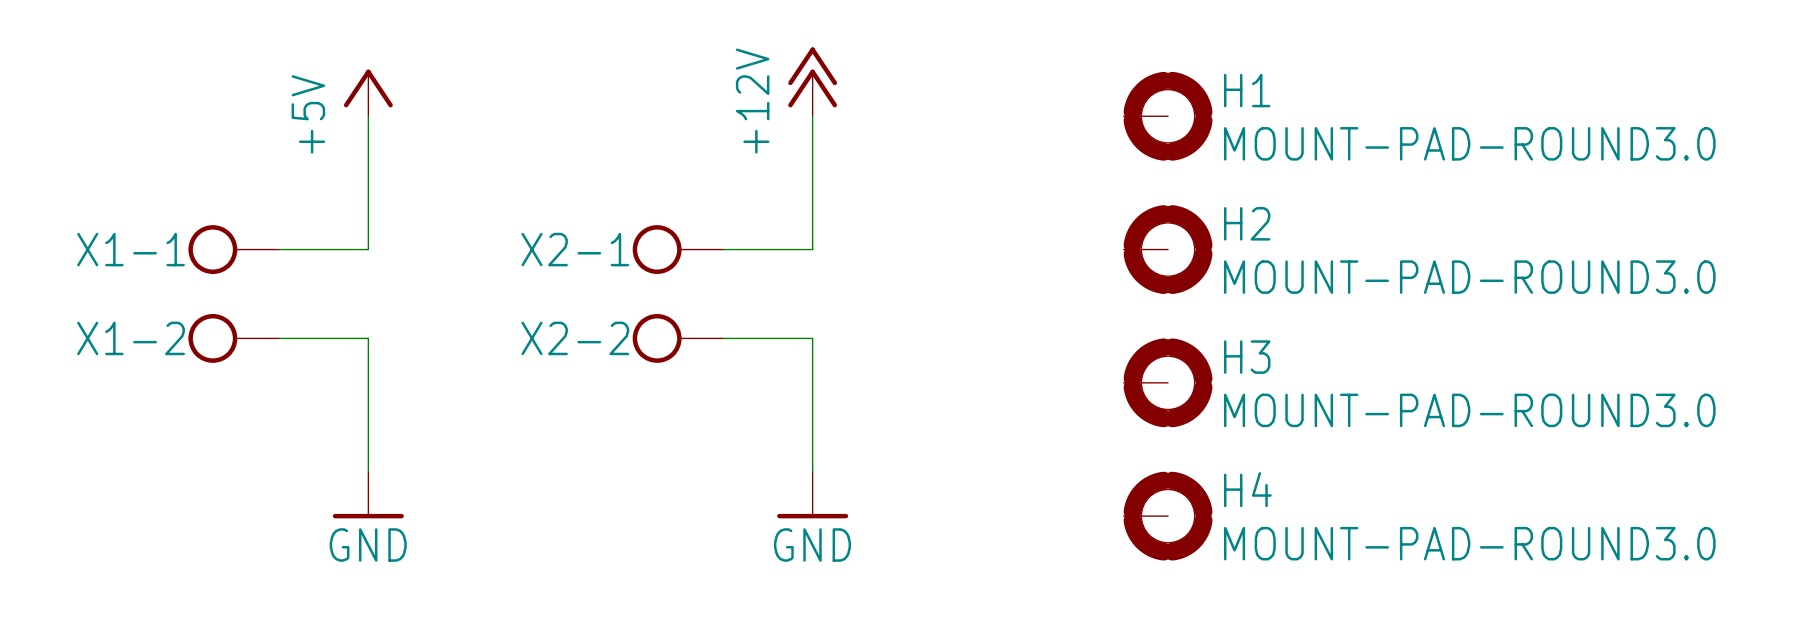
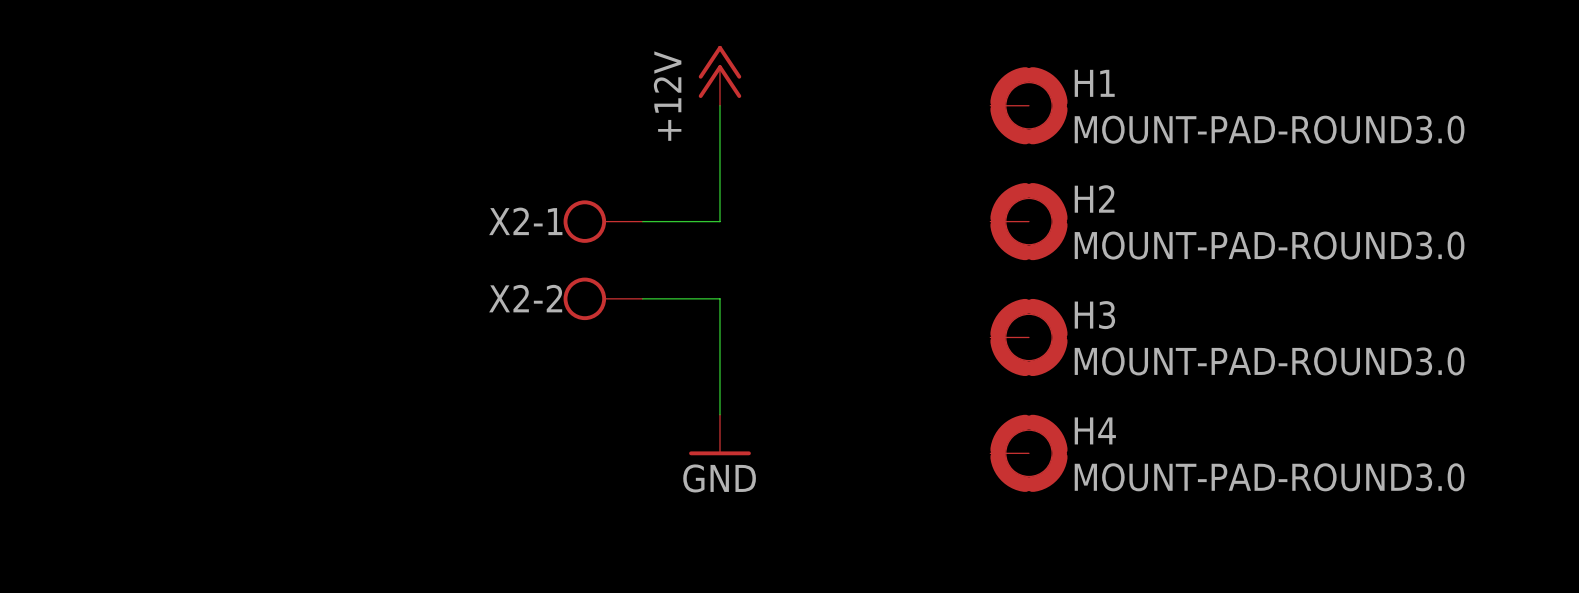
power symbol: +5V (368, 92) -> none
wire: (368, 116) (368, 249) (279, 249) -> none
X1-1: (233, 249) -> none
X1-2: (233, 338) -> none
wire: (279, 338) (368, 338) (368, 471) -> none
power symbol: GND (368, 495) -> none

